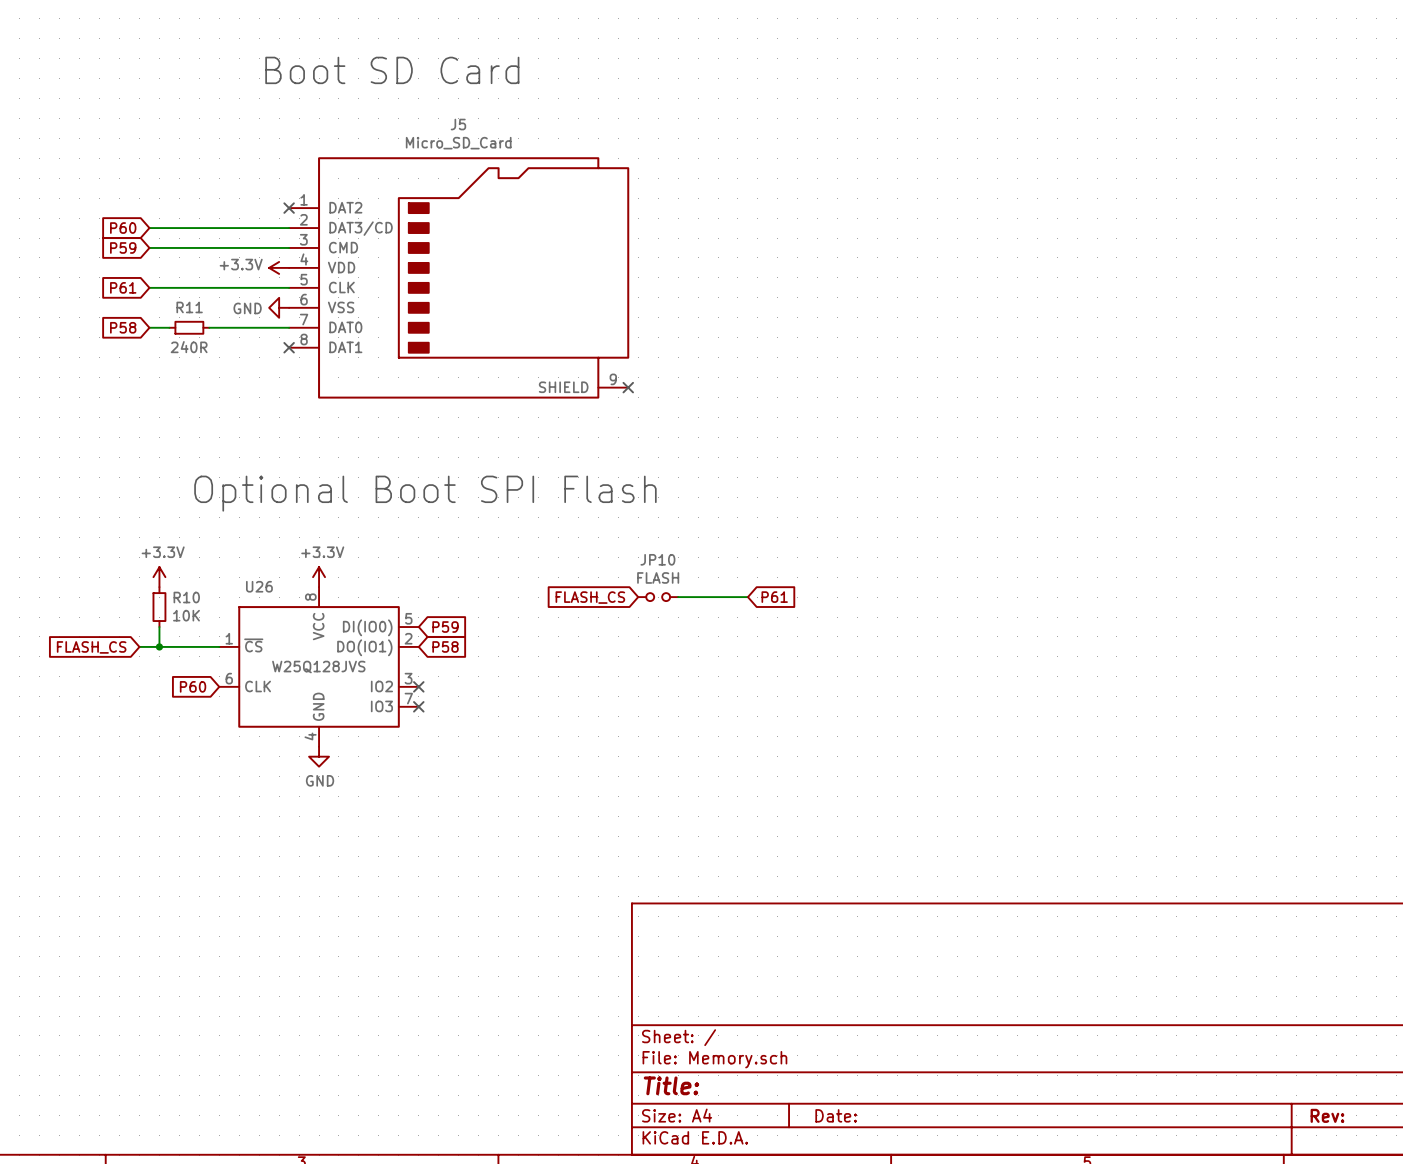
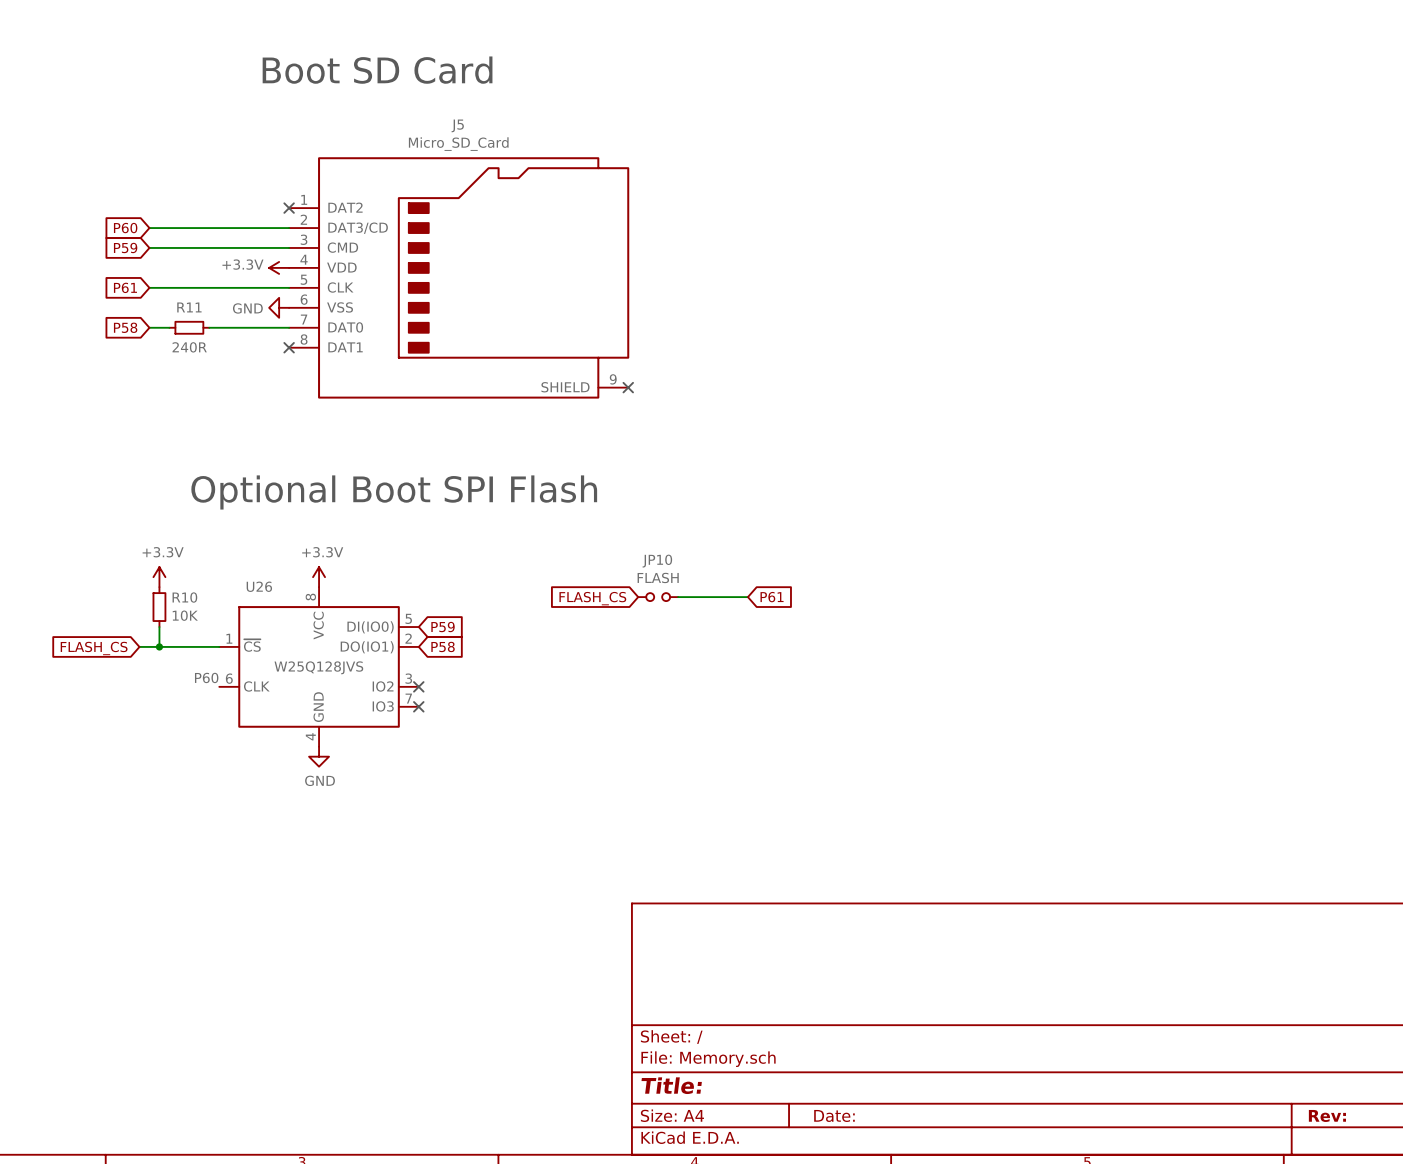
label: none -> P60 (206, 677)
global label: P60 (193, 686) -> none

